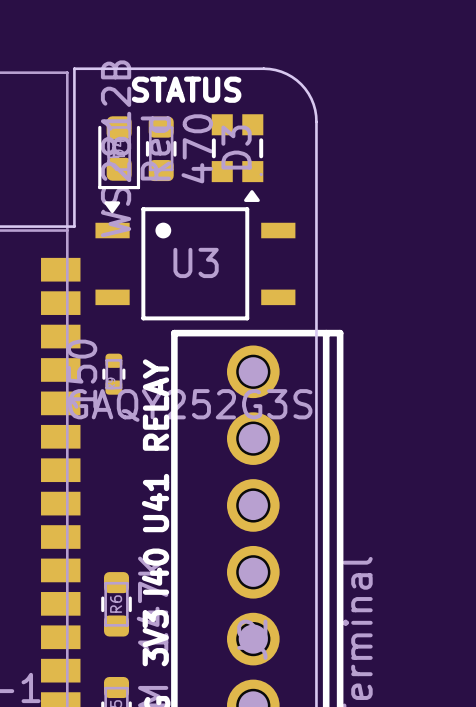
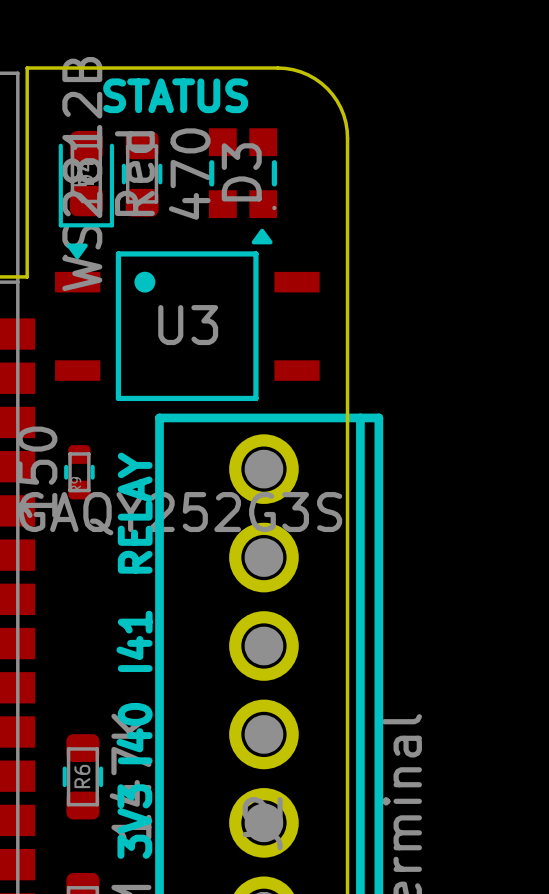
text: U41 (155, 503) -> I41 (134, 641)

